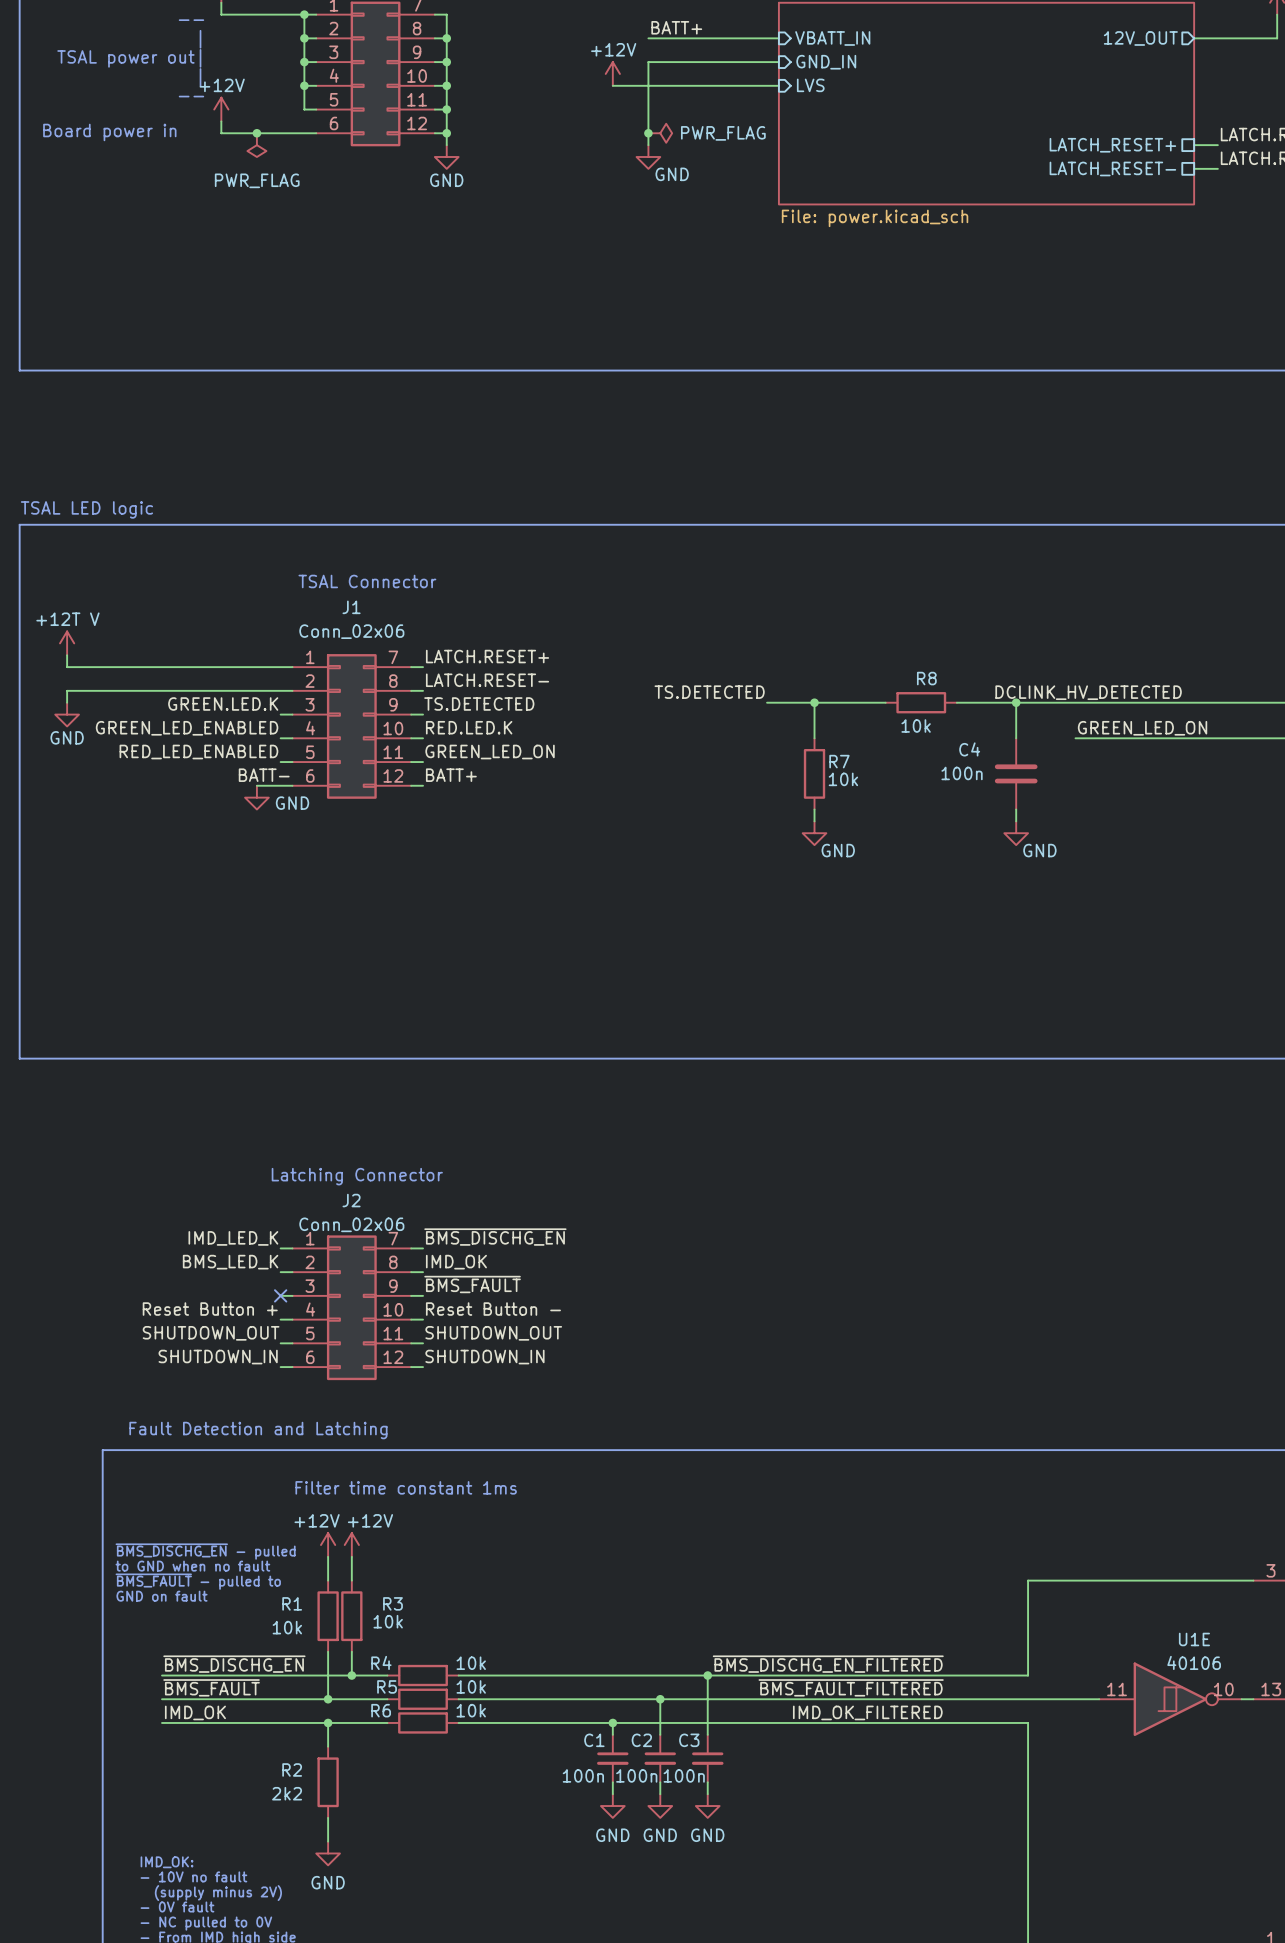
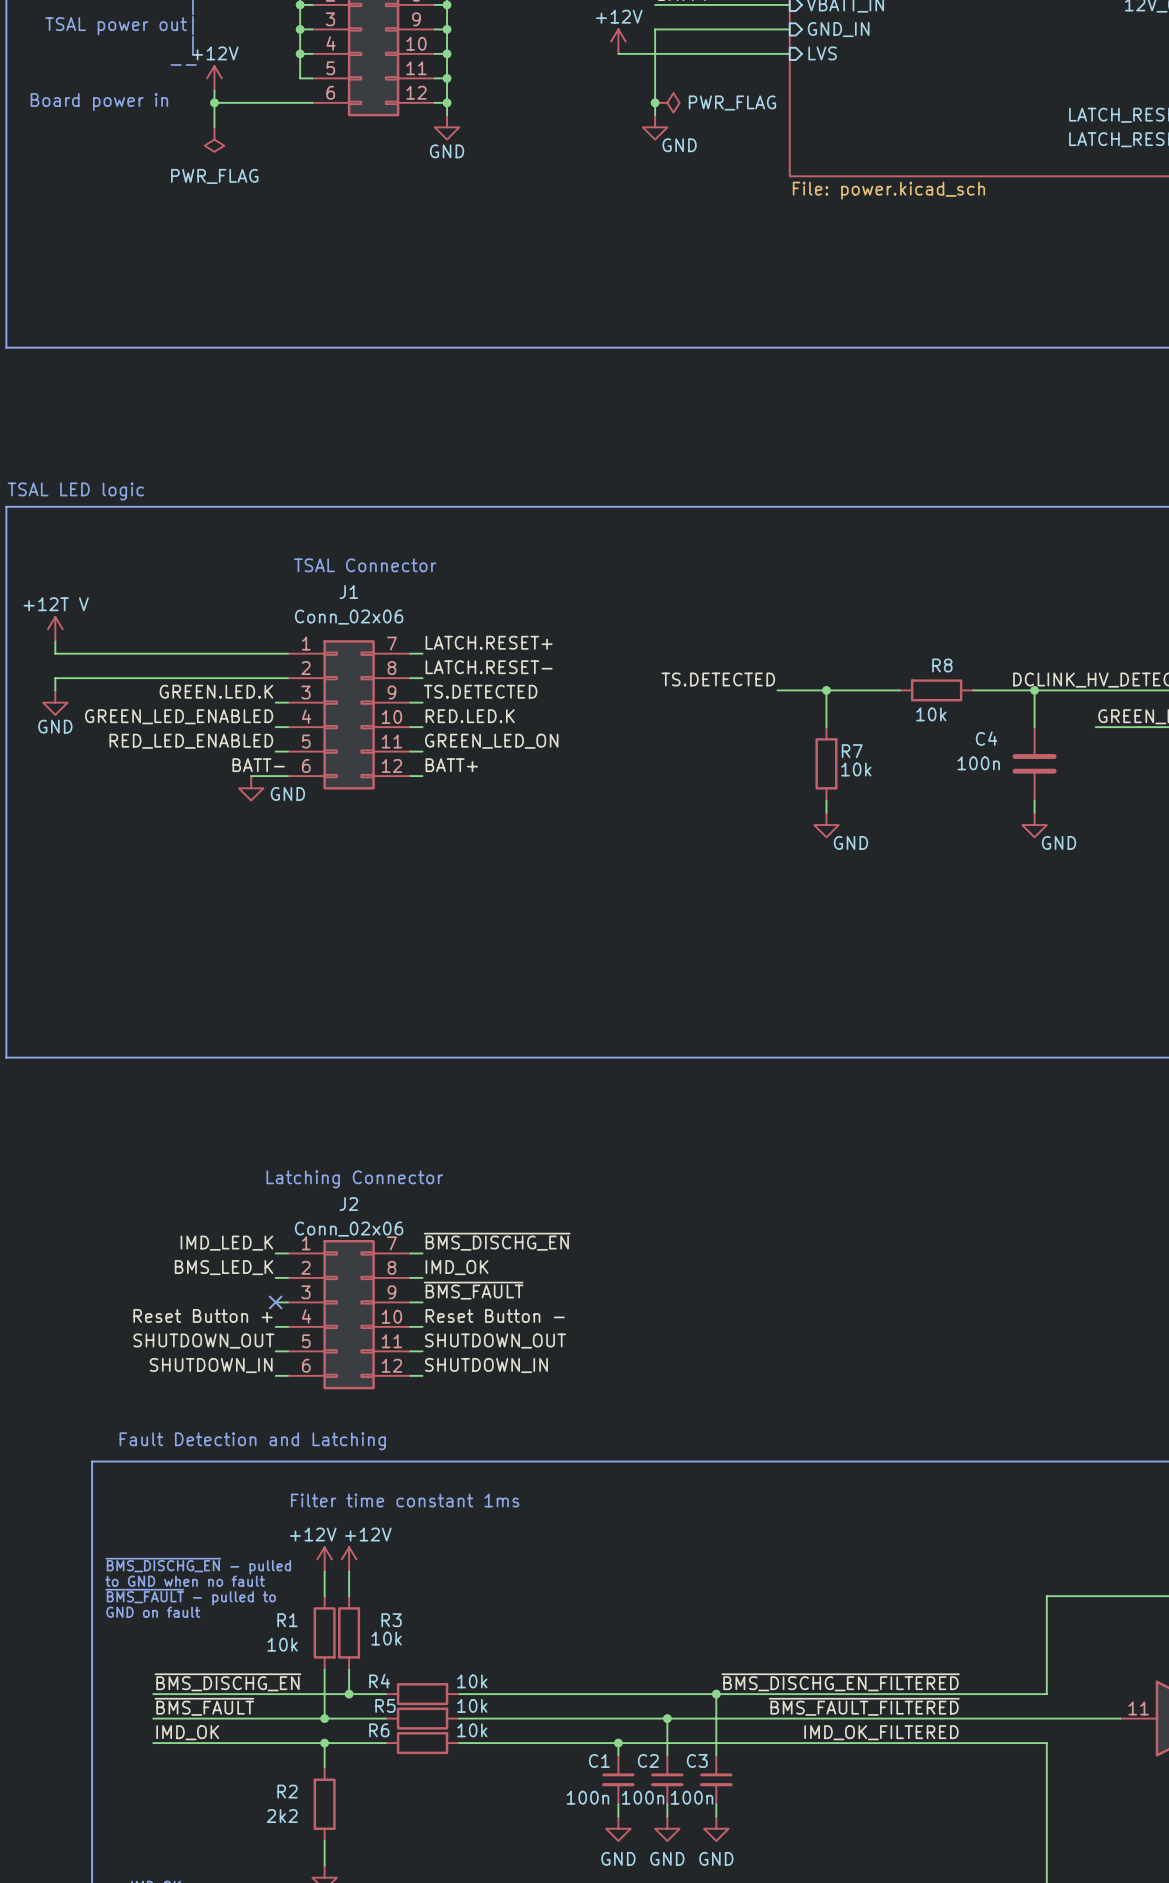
wire: none -> (214, 102) (214, 127)
junction position: (256, 133) -> (214, 102)
power symbol position: PWR_FLAG (256, 145) -> PWR_FLAG (214, 139)

